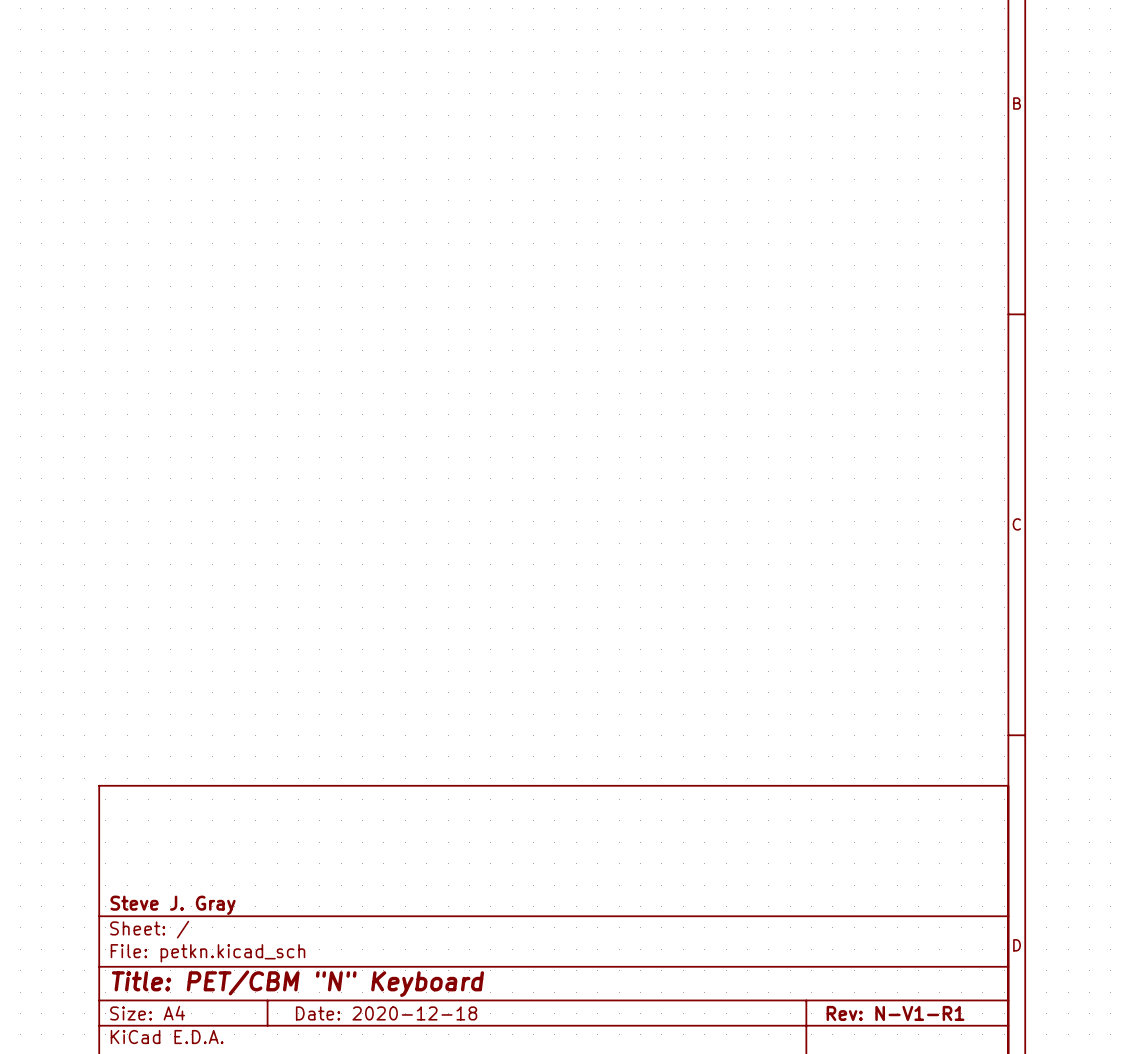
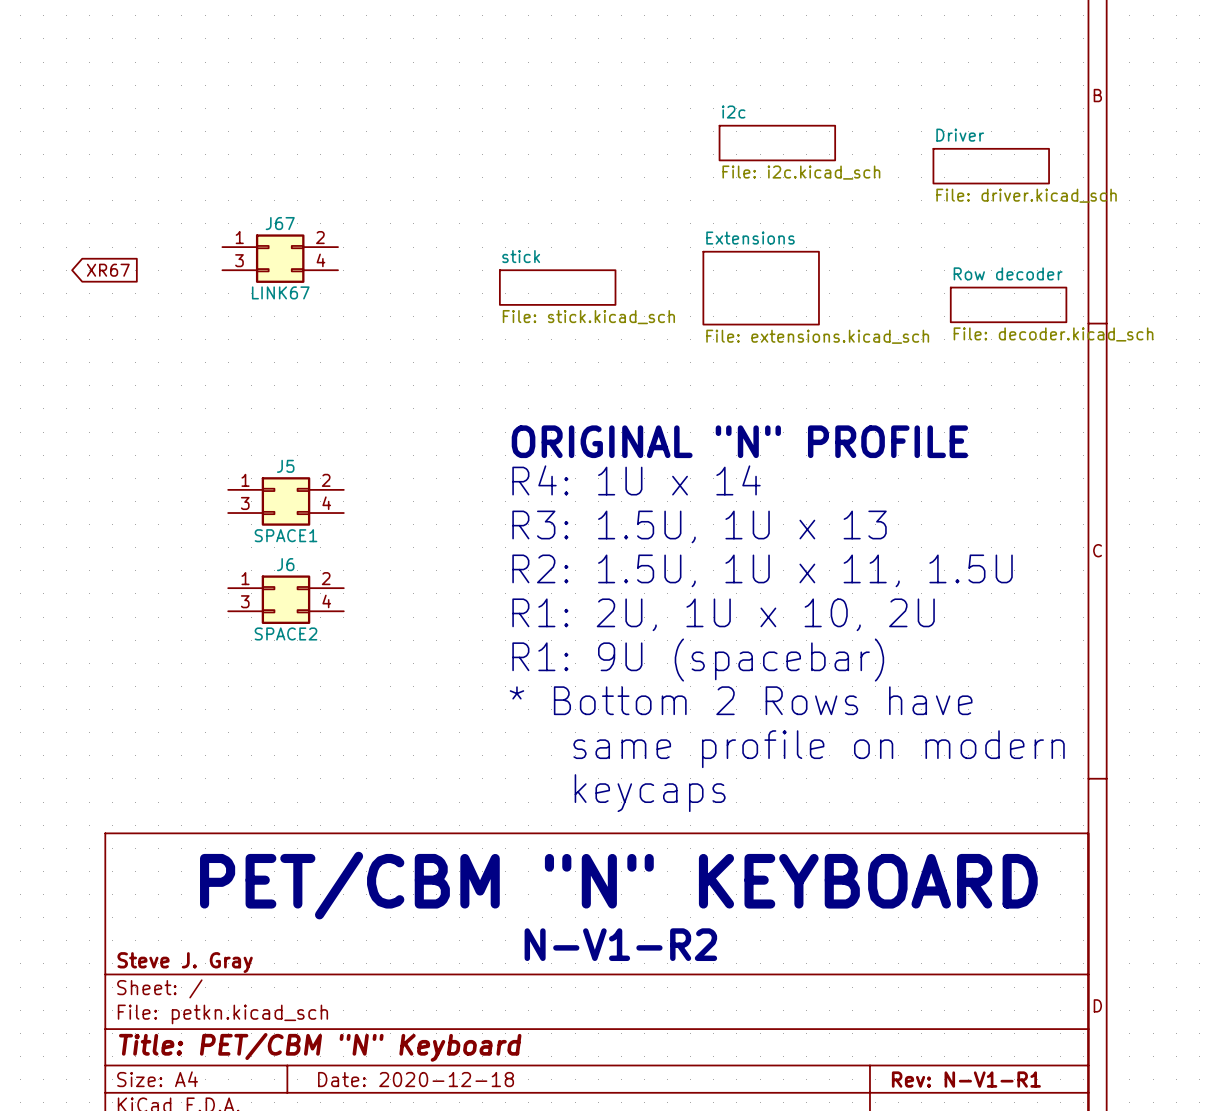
sheet i2c: none -> File: i2c.kicad_sch (777, 143)
sheet Driver: none -> File: driver.kicad_sch (991, 166)
J67: none -> LINK67 (280, 258)
global label: none -> XR67 (108, 270)
sheet stick: none -> File: stick.kicad_sch (557, 287)
sheet Extensions: none -> File: extensions.kicad_sch (761, 288)
sheet Row decoder: none -> File: decoder.kicad_sch (1008, 304)
text: none -> ORIGINAL "N" PROFILE (739, 441)
text: none -> R4: 1U x 14 (636, 480)
J5: none -> SPACE1 (285, 501)
text: none -> R3: 1.5U, 1U x 13 (699, 526)
text: none -> R2: 1.5U, 1U x 11, 1.5U (762, 570)
J6: none -> SPACE2 (285, 599)
text: none -> R1: 2U, 1U x 10, 2U (723, 614)
text: none -> R1: 9U (spacebar) (698, 660)
text: none -> * Bottom 2 Rows have (741, 700)
text: none -> same profile on modern (819, 749)
text: none -> keycaps (650, 793)
text: none -> PET/CBM "N" KEYBOARD (618, 885)
text: none -> N-V1-R2 (620, 944)

